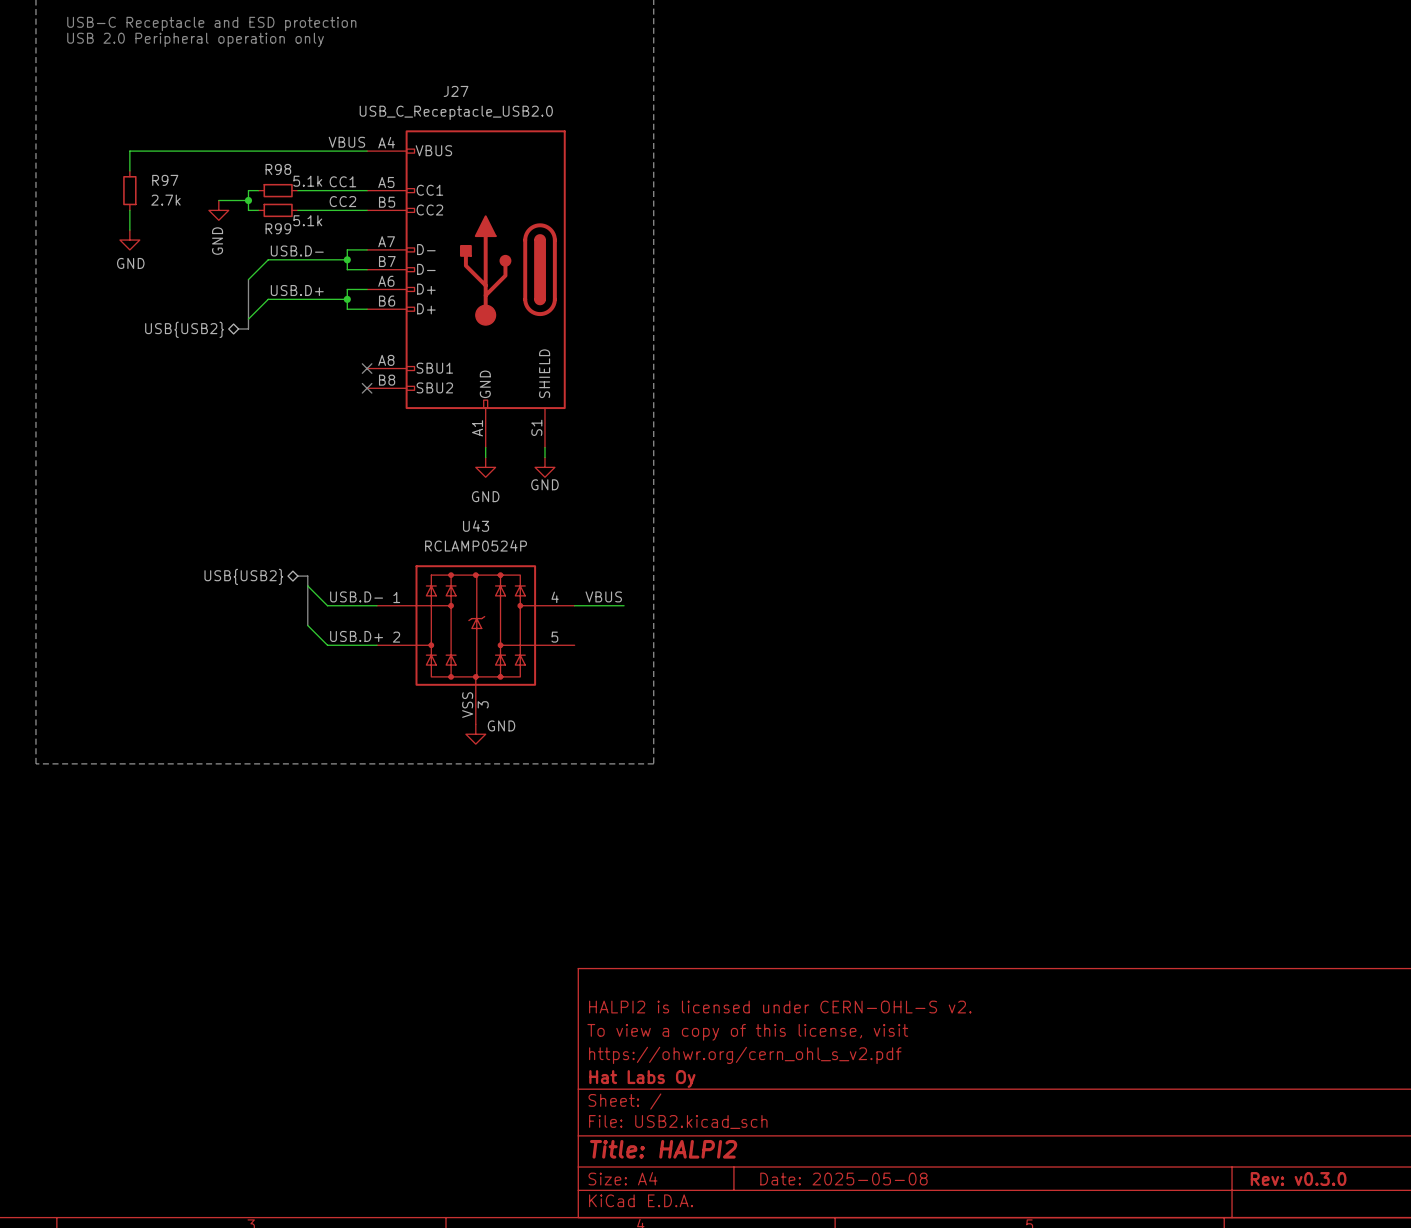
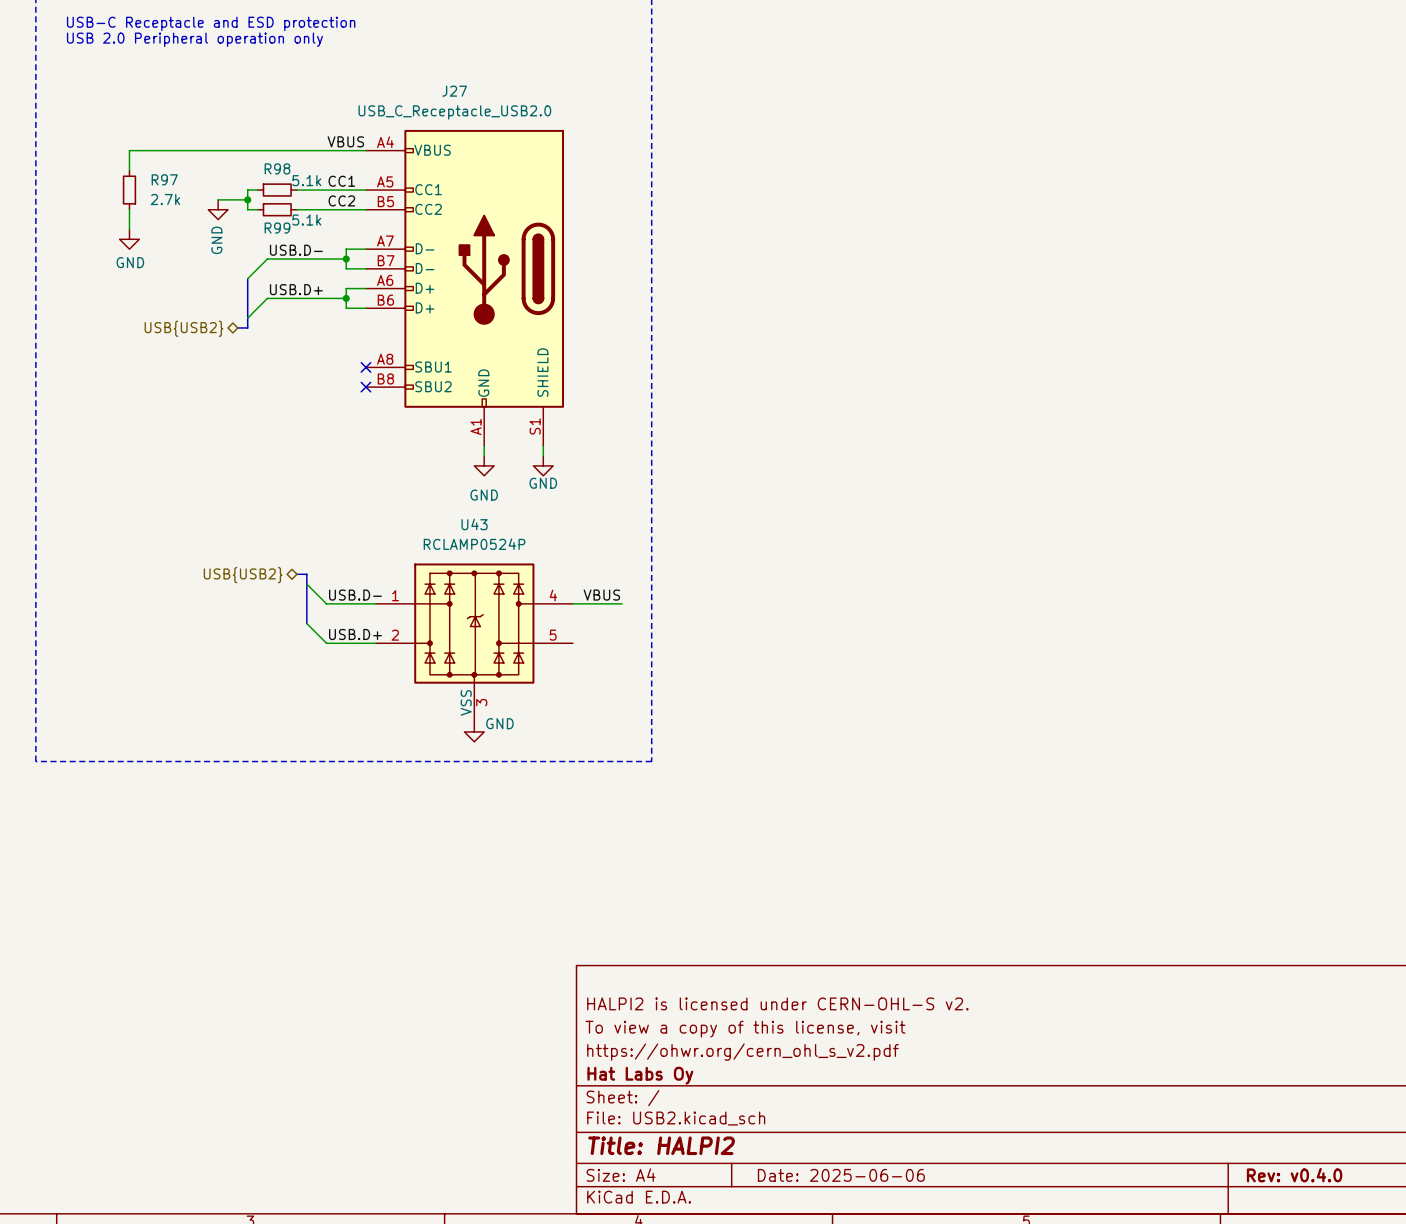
title block: Date: 2025-05-08 (843, 1179) -> Date: 2025-06-06 (841, 1175)
title block: Rev: v0.3.0 (1298, 1179) -> Rev: v0.4.0 (1294, 1175)

